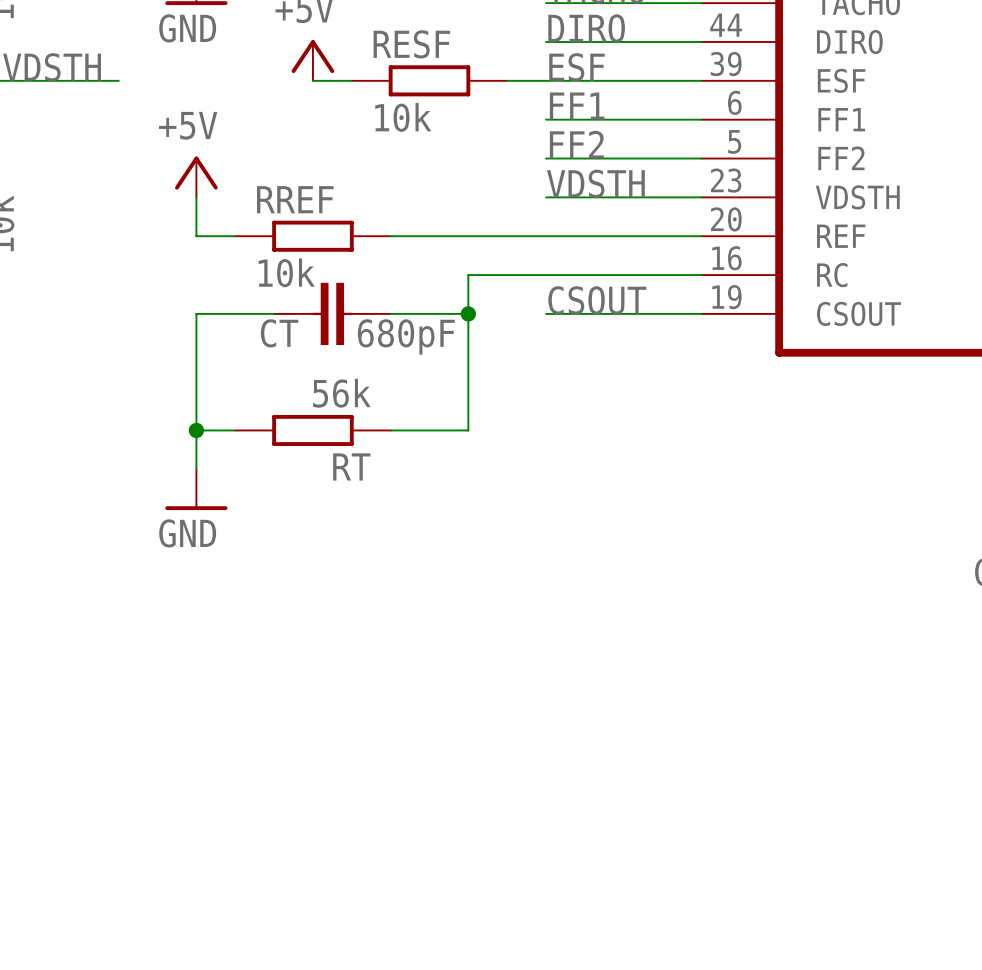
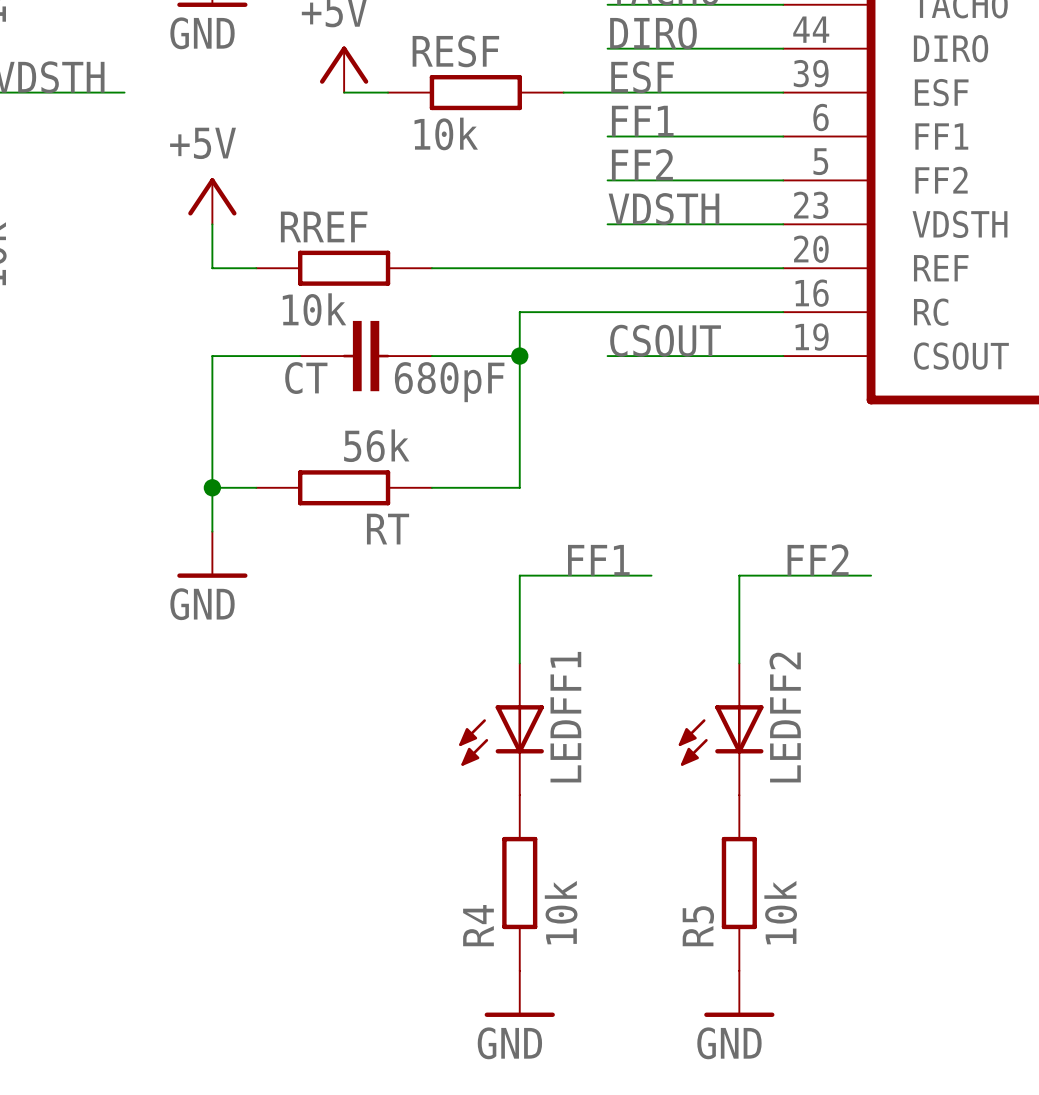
label: none -> FF1 (598, 560)
label: none -> FF2 (818, 559)
wire: none -> (651, 575) (519, 575) (519, 663)
wire: none -> (871, 575) (739, 575) (739, 663)
LEDFF1: none -> (501, 729)
LEDFF2: none -> (721, 729)
R4: none -> 10k (519, 883)
R5: none -> 10k (739, 883)
power symbol: none -> GND (519, 993)
power symbol: none -> GND (739, 993)

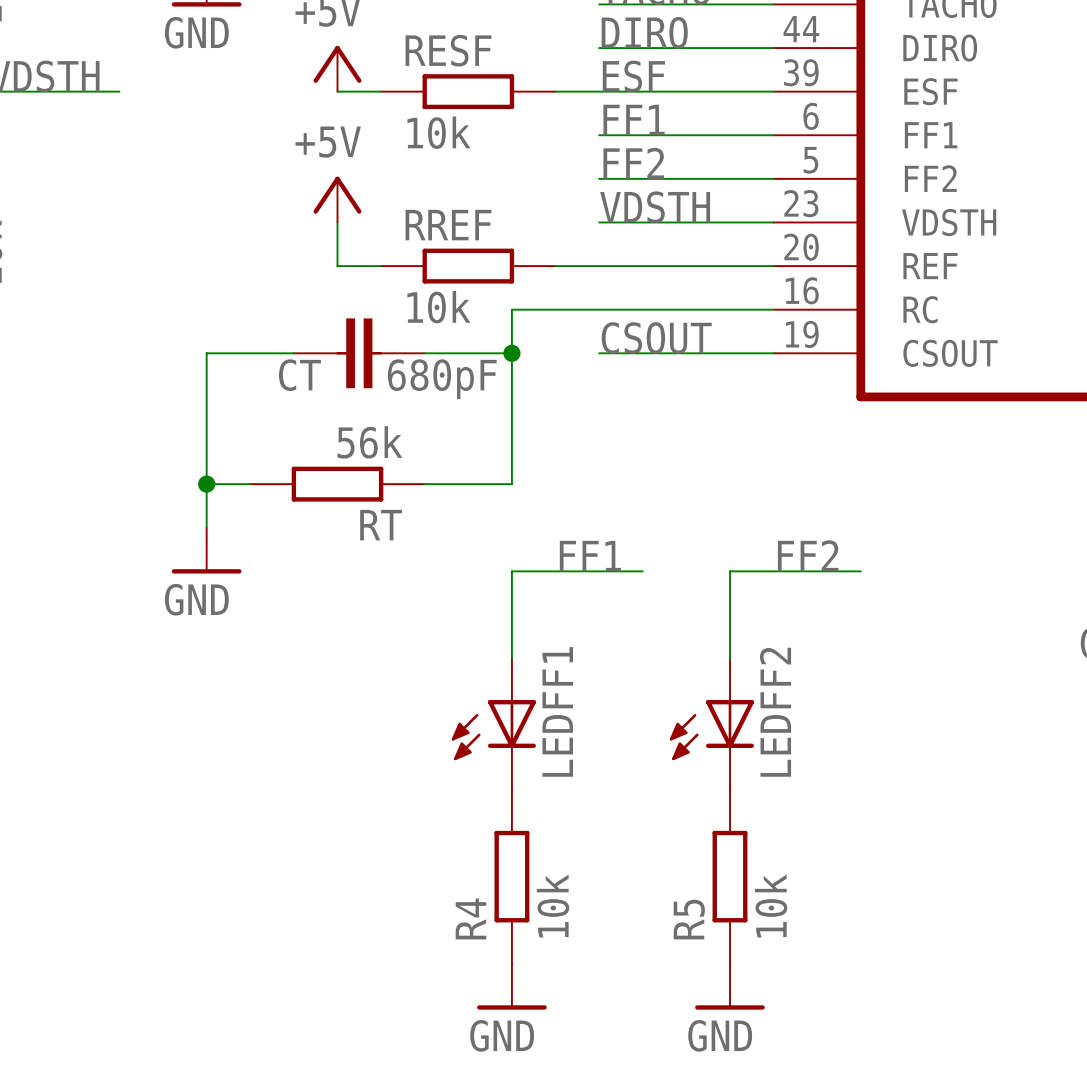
power symbol position: +5V (212, 201) -> +5V (337, 199)
wire: (212, 224) (212, 268) (256, 268) -> (337, 222) (337, 266) (381, 266)
RREF position: (344, 268) -> (468, 266)
wire: (431, 268) (563, 268) -> none

